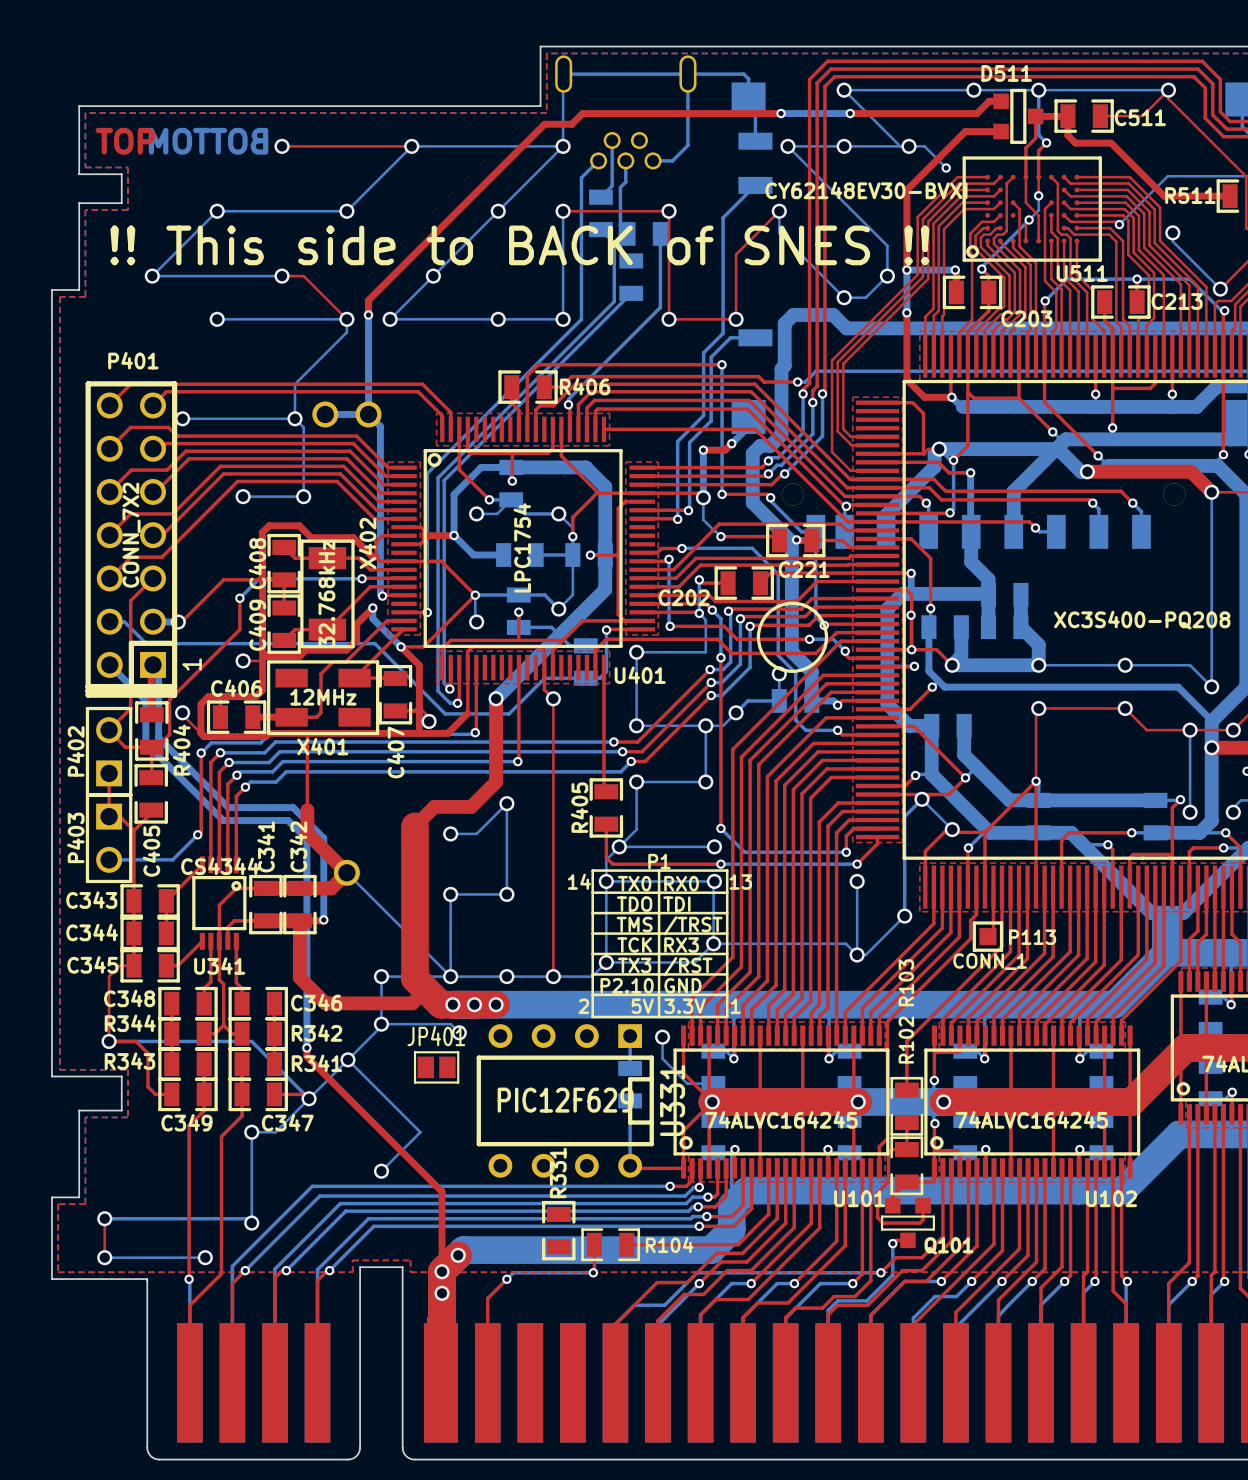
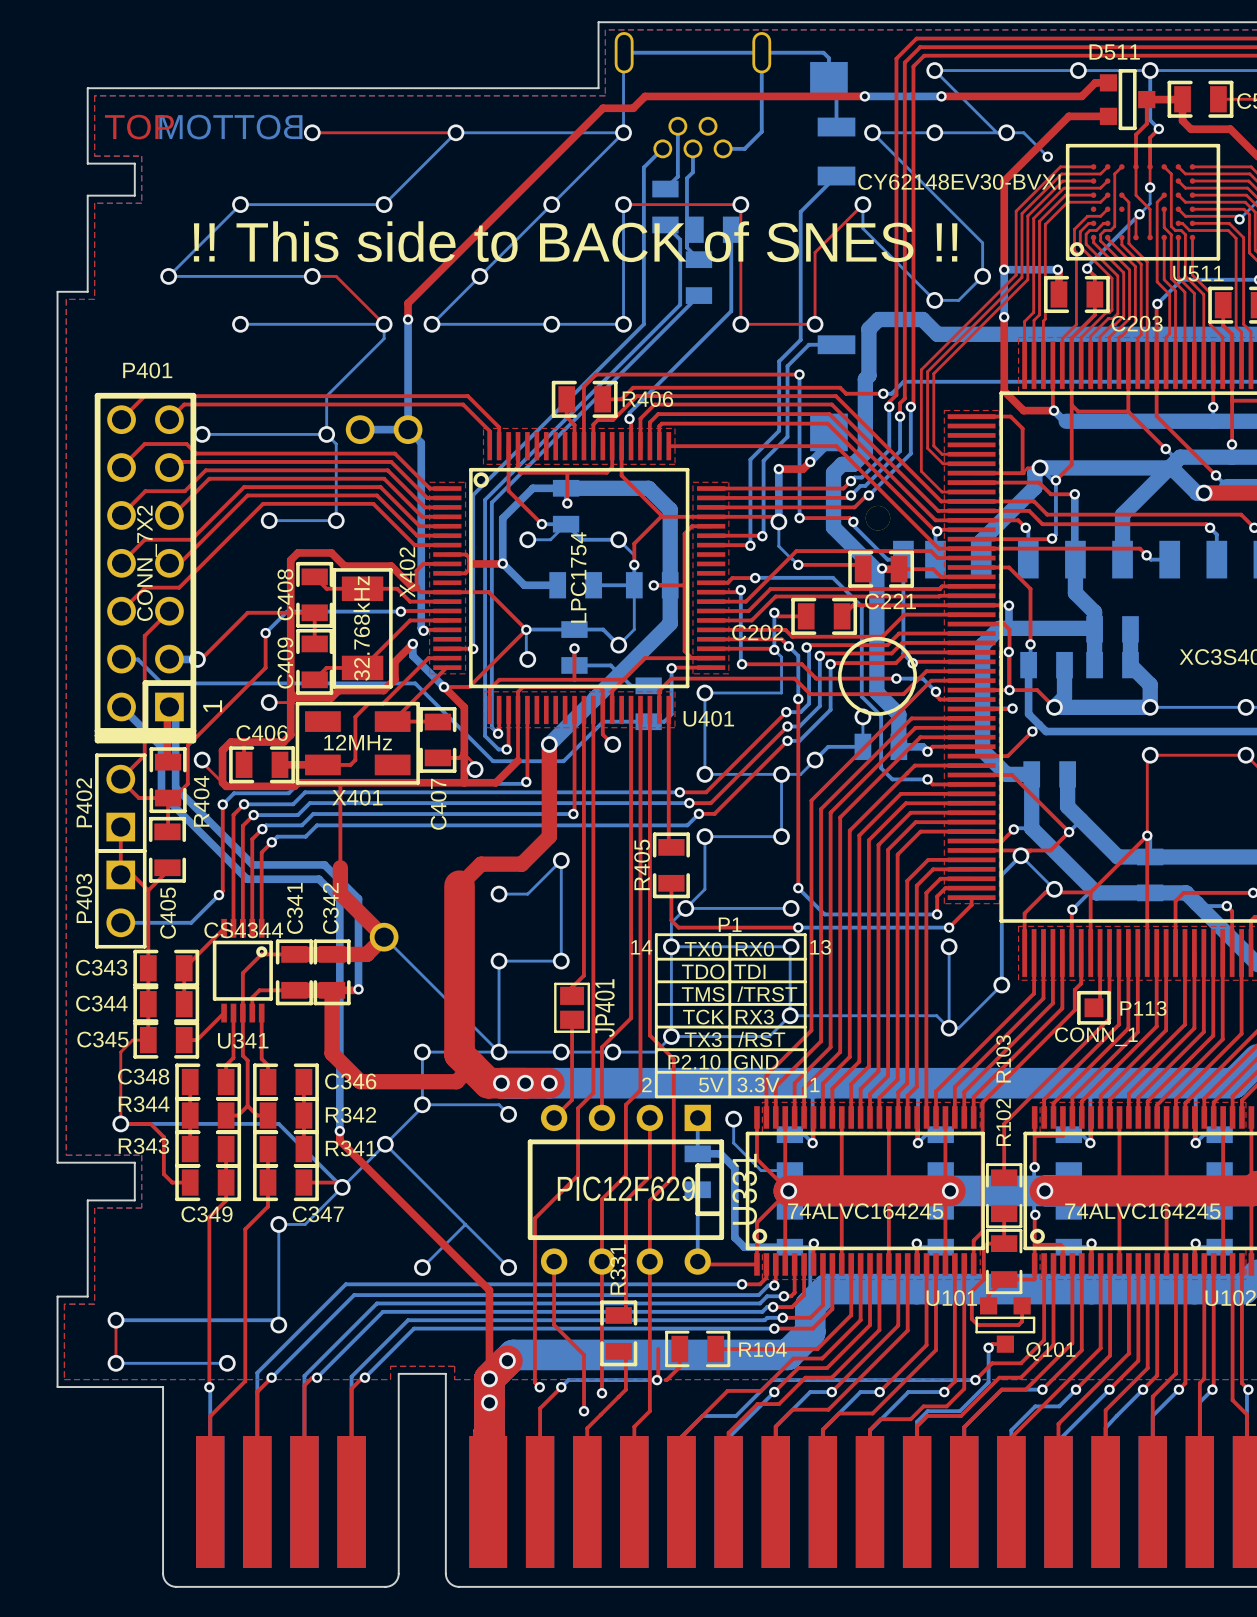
top track: none -> (583, 709) (583, 975) (572, 987) (572, 995)
top track: none -> (593, 709) (593, 1093) (578, 1108) (578, 1175) (534, 1218) (534, 1382) (539, 1387)
top track: none -> (631, 709) (631, 1018) (601, 1047) (601, 1117)
top track: none -> (640, 709) (640, 1090) (625, 1104) (625, 1175) (601, 1199) (601, 1393)
top track: none -> (649, 709) (649, 1035) (673, 1059) (673, 1176) (649, 1200) (649, 1411) (634, 1426) (634, 1502)
top track: (553, 698) (553, 976) -> none
top track: none -> (572, 1019) (572, 1099) (554, 1117)
top track: none -> (649, 1117) (649, 1176) (625, 1200) (625, 1316)
JP401 rotation: 0° (436, 1067) -> 90° clockwise (572, 1007)
JP401 position: (436, 1067) -> (572, 1007)
bottom track: none -> (697, 1153) (720, 1153) (734, 1168) (734, 1237) (744, 1247) (789, 1247)
bottom track: none -> (465, 1224) (508, 1267)
top track: none -> (554, 1261) (554, 1325) (584, 1354) (584, 1411)
via: none -> (508, 1267)
R104 position: (610, 1244) -> (697, 1348)
top track: none -> (679, 1348) (679, 1366) (665, 1380)
top track: (626, 1244) (646, 1244) -> none
top track: none -> (625, 1352) (625, 1389) (587, 1428) (587, 1502)
via: none -> (539, 1387)
via: none -> (601, 1393)
via: none -> (584, 1411)

